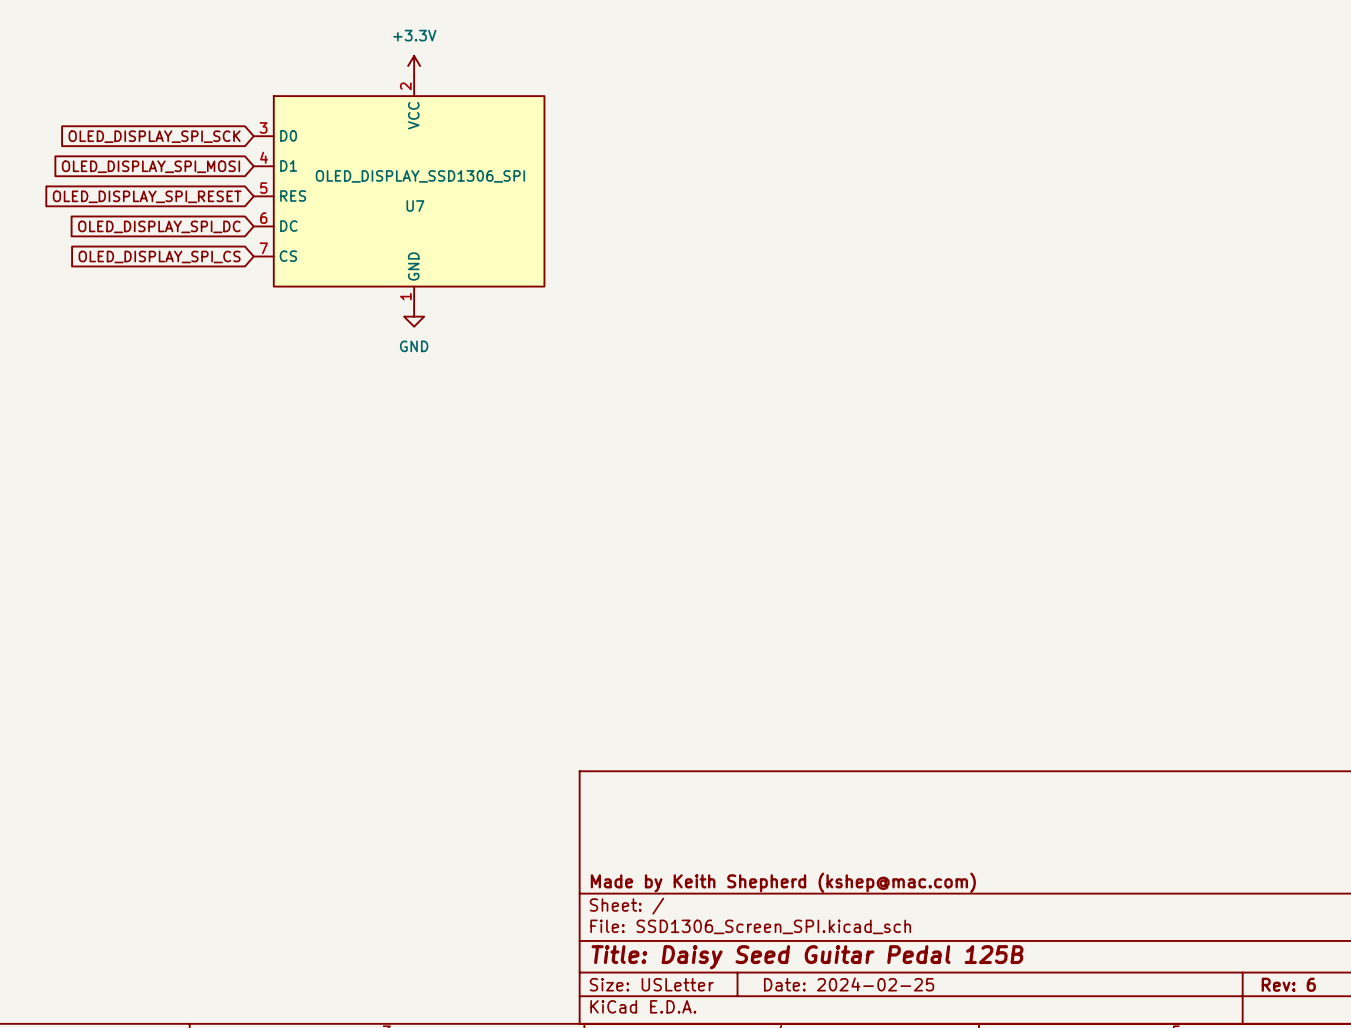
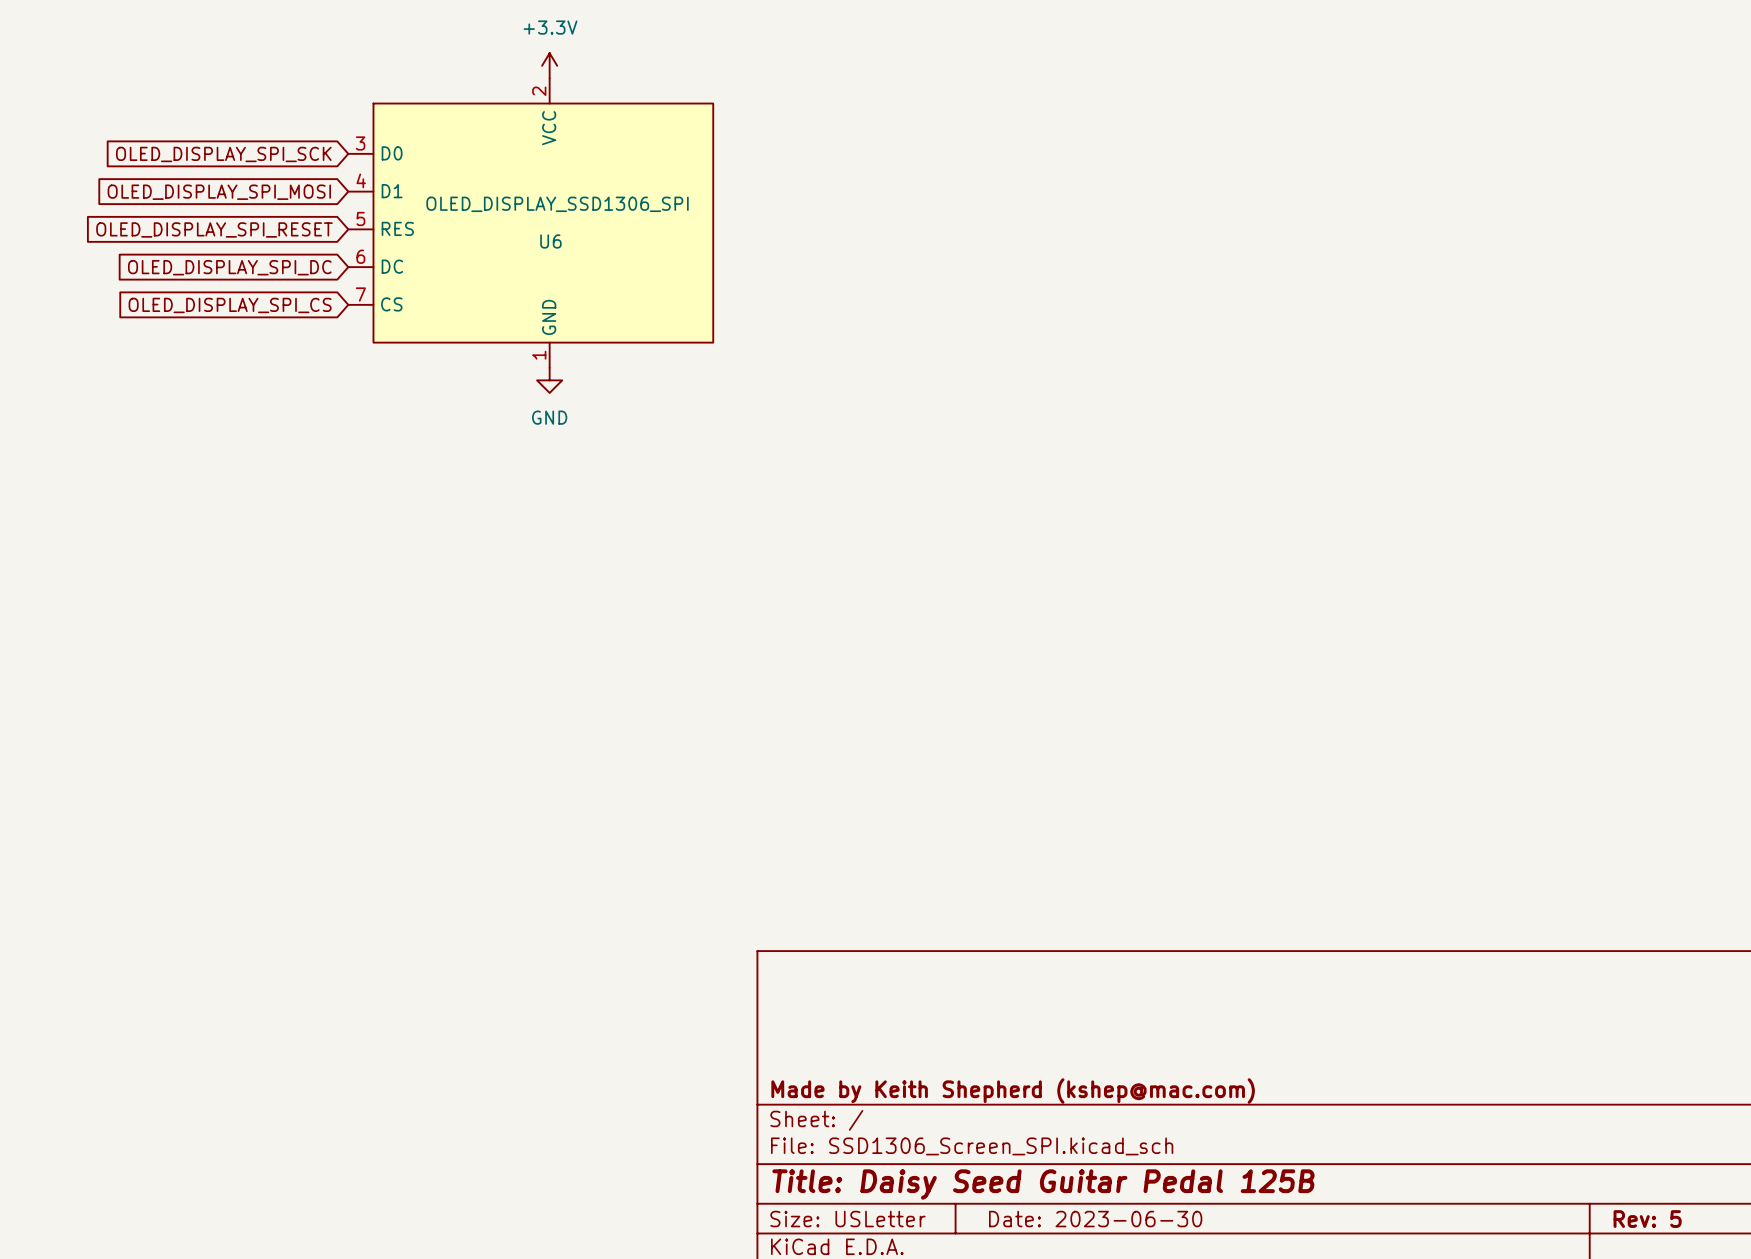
U7 name: U7 (415, 206) -> U6 (550, 241)
title block: Date: 2024-02-25 (849, 984) -> Date: 2023-06-30 (1095, 1219)
title block: Rev: 6 (1288, 984) -> Rev: 5 (1647, 1219)

